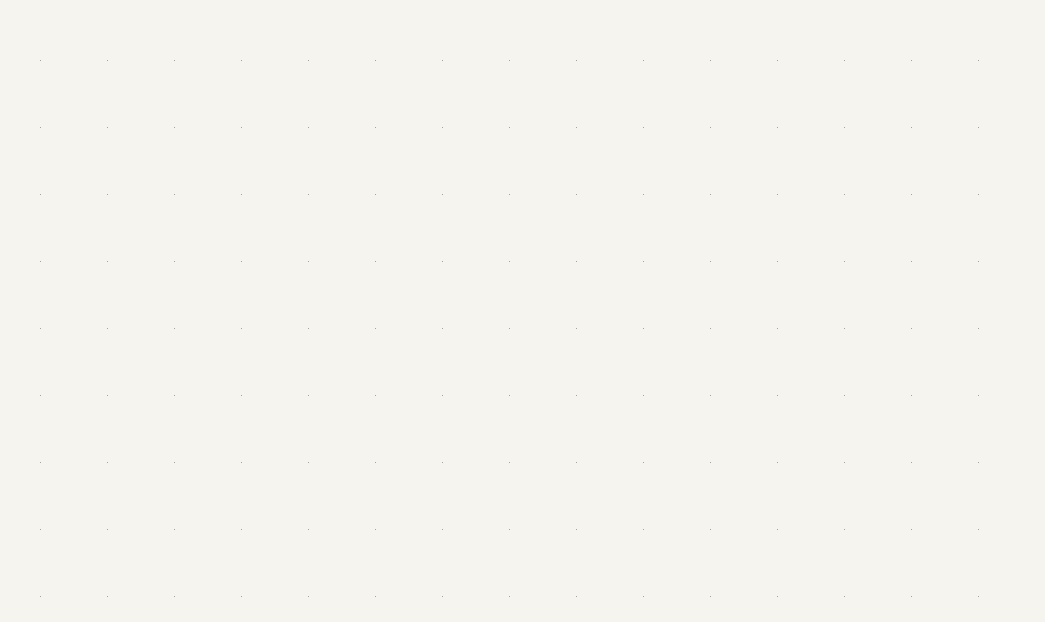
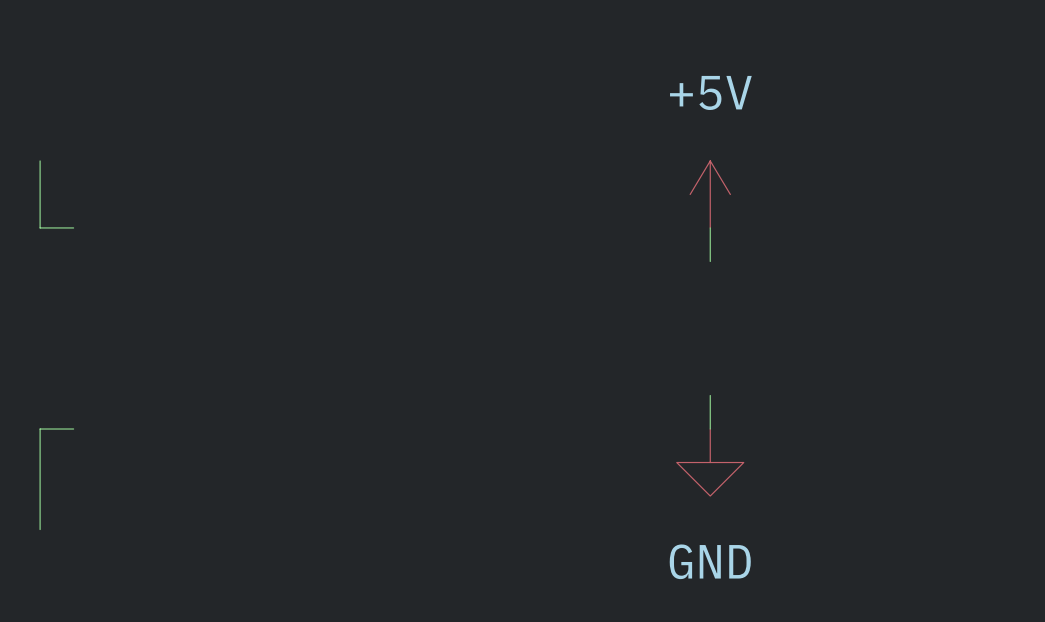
wire: none -> (40, 160) (40, 227) (73, 227)
power symbol: none -> +5V (710, 194)
wire: none -> (710, 227) (710, 261)
wire: none -> (710, 395) (710, 429)
wire: none -> (73, 429) (40, 429) (40, 529)
power symbol: none -> GND (710, 462)

